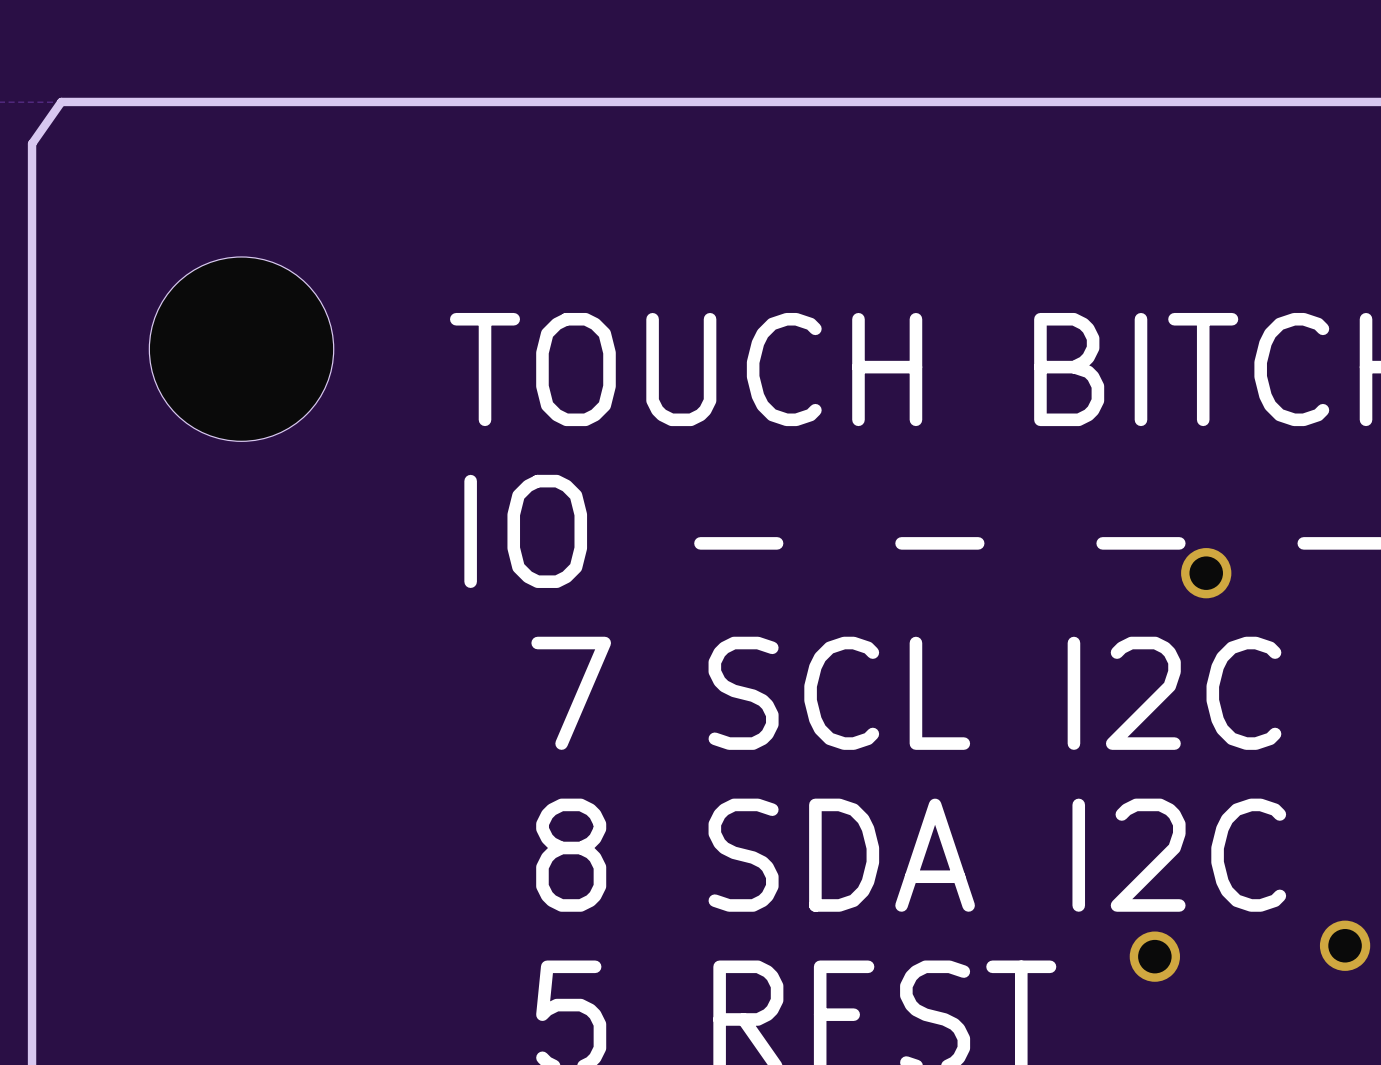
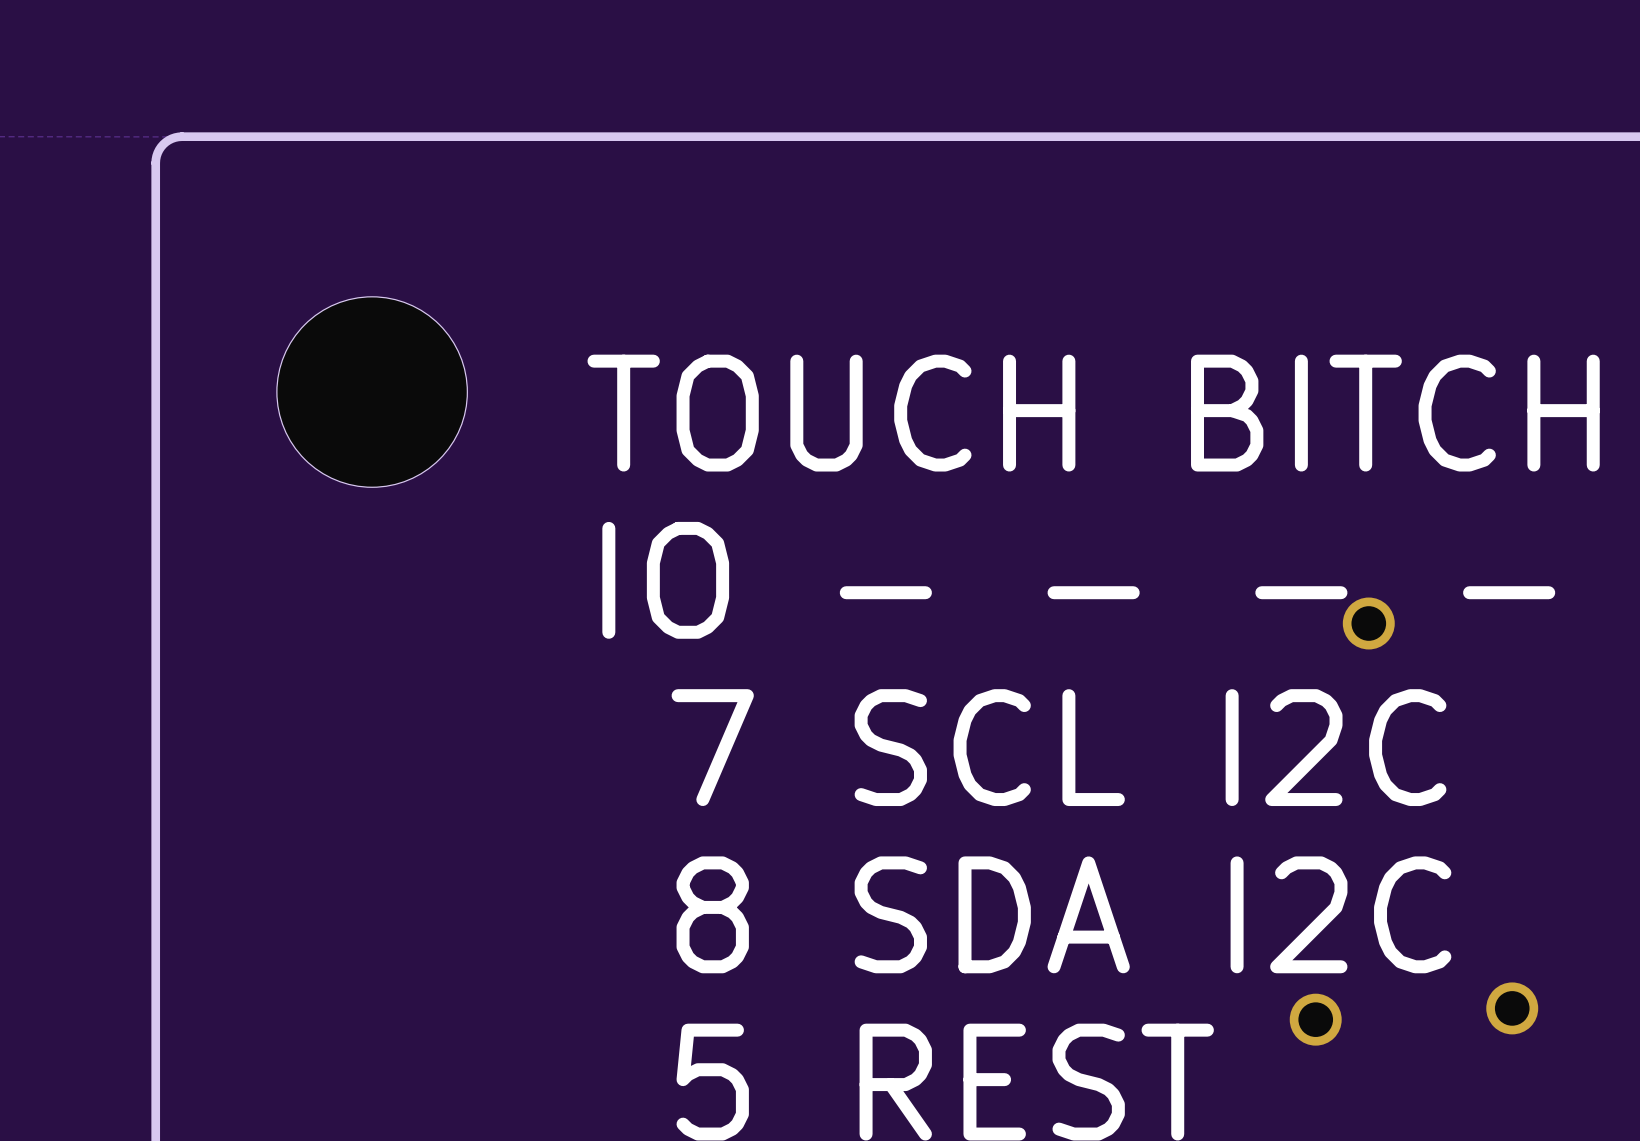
board edge: (61, 101) (32, 143) -> (186, 136) (171, 138) (161, 146) (155, 159) (155, 179)

